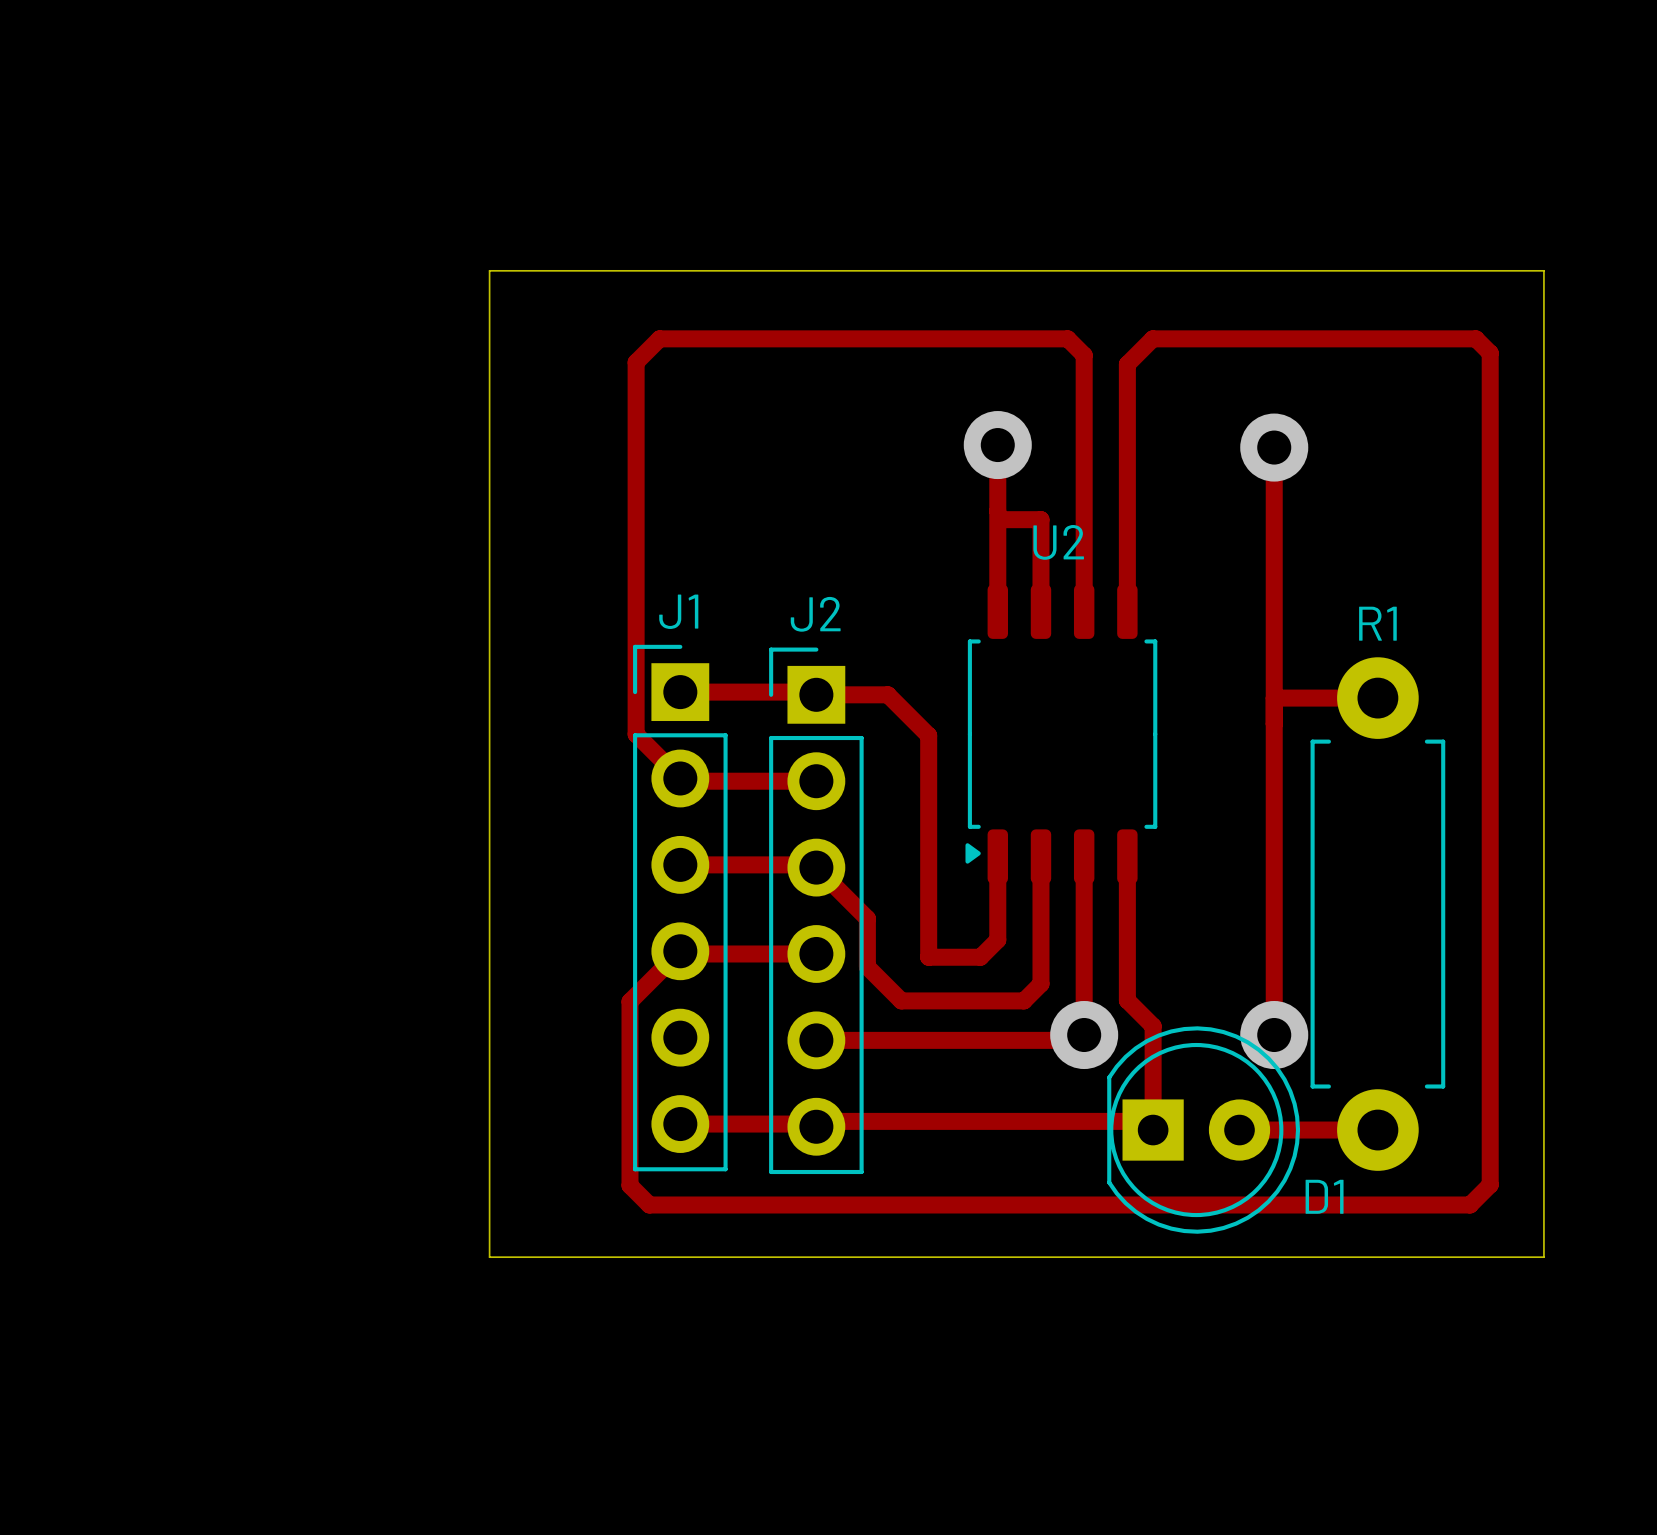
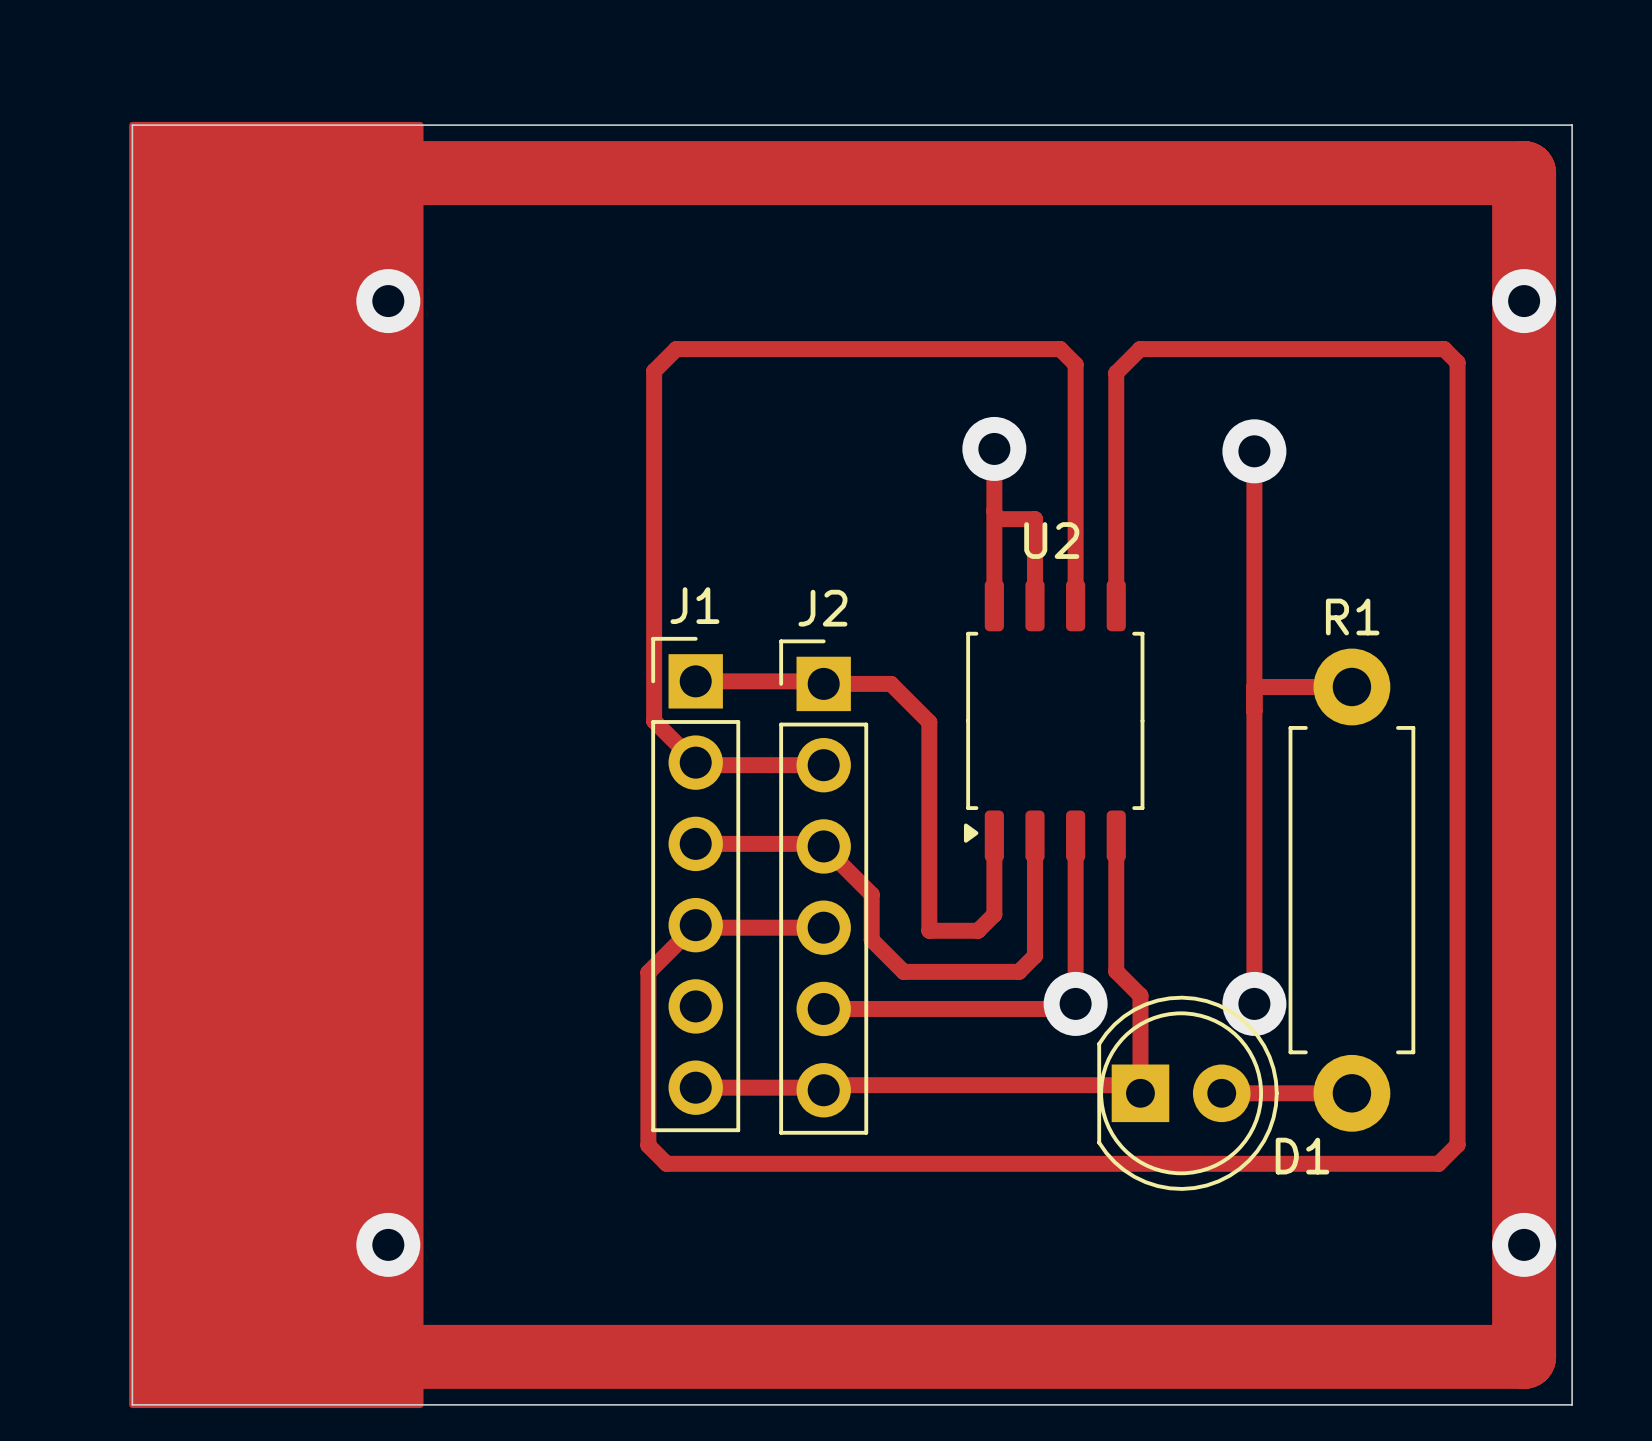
drawing: none -> [129, 121, 424, 1409]
board edge: none -> (132, 125) (1572, 125) (1572, 1404) (132, 1404) (132, 125)
track: none -> (276, 173) (1524, 173) (1524, 1356) (228, 1356)
board edge: (489, 270) (1543, 270) (1543, 1257) (489, 1257) (489, 270) -> none
via: none -> (388, 301)
via: none -> (1524, 301)
via: none -> (388, 1244)
via: none -> (1524, 1244)

